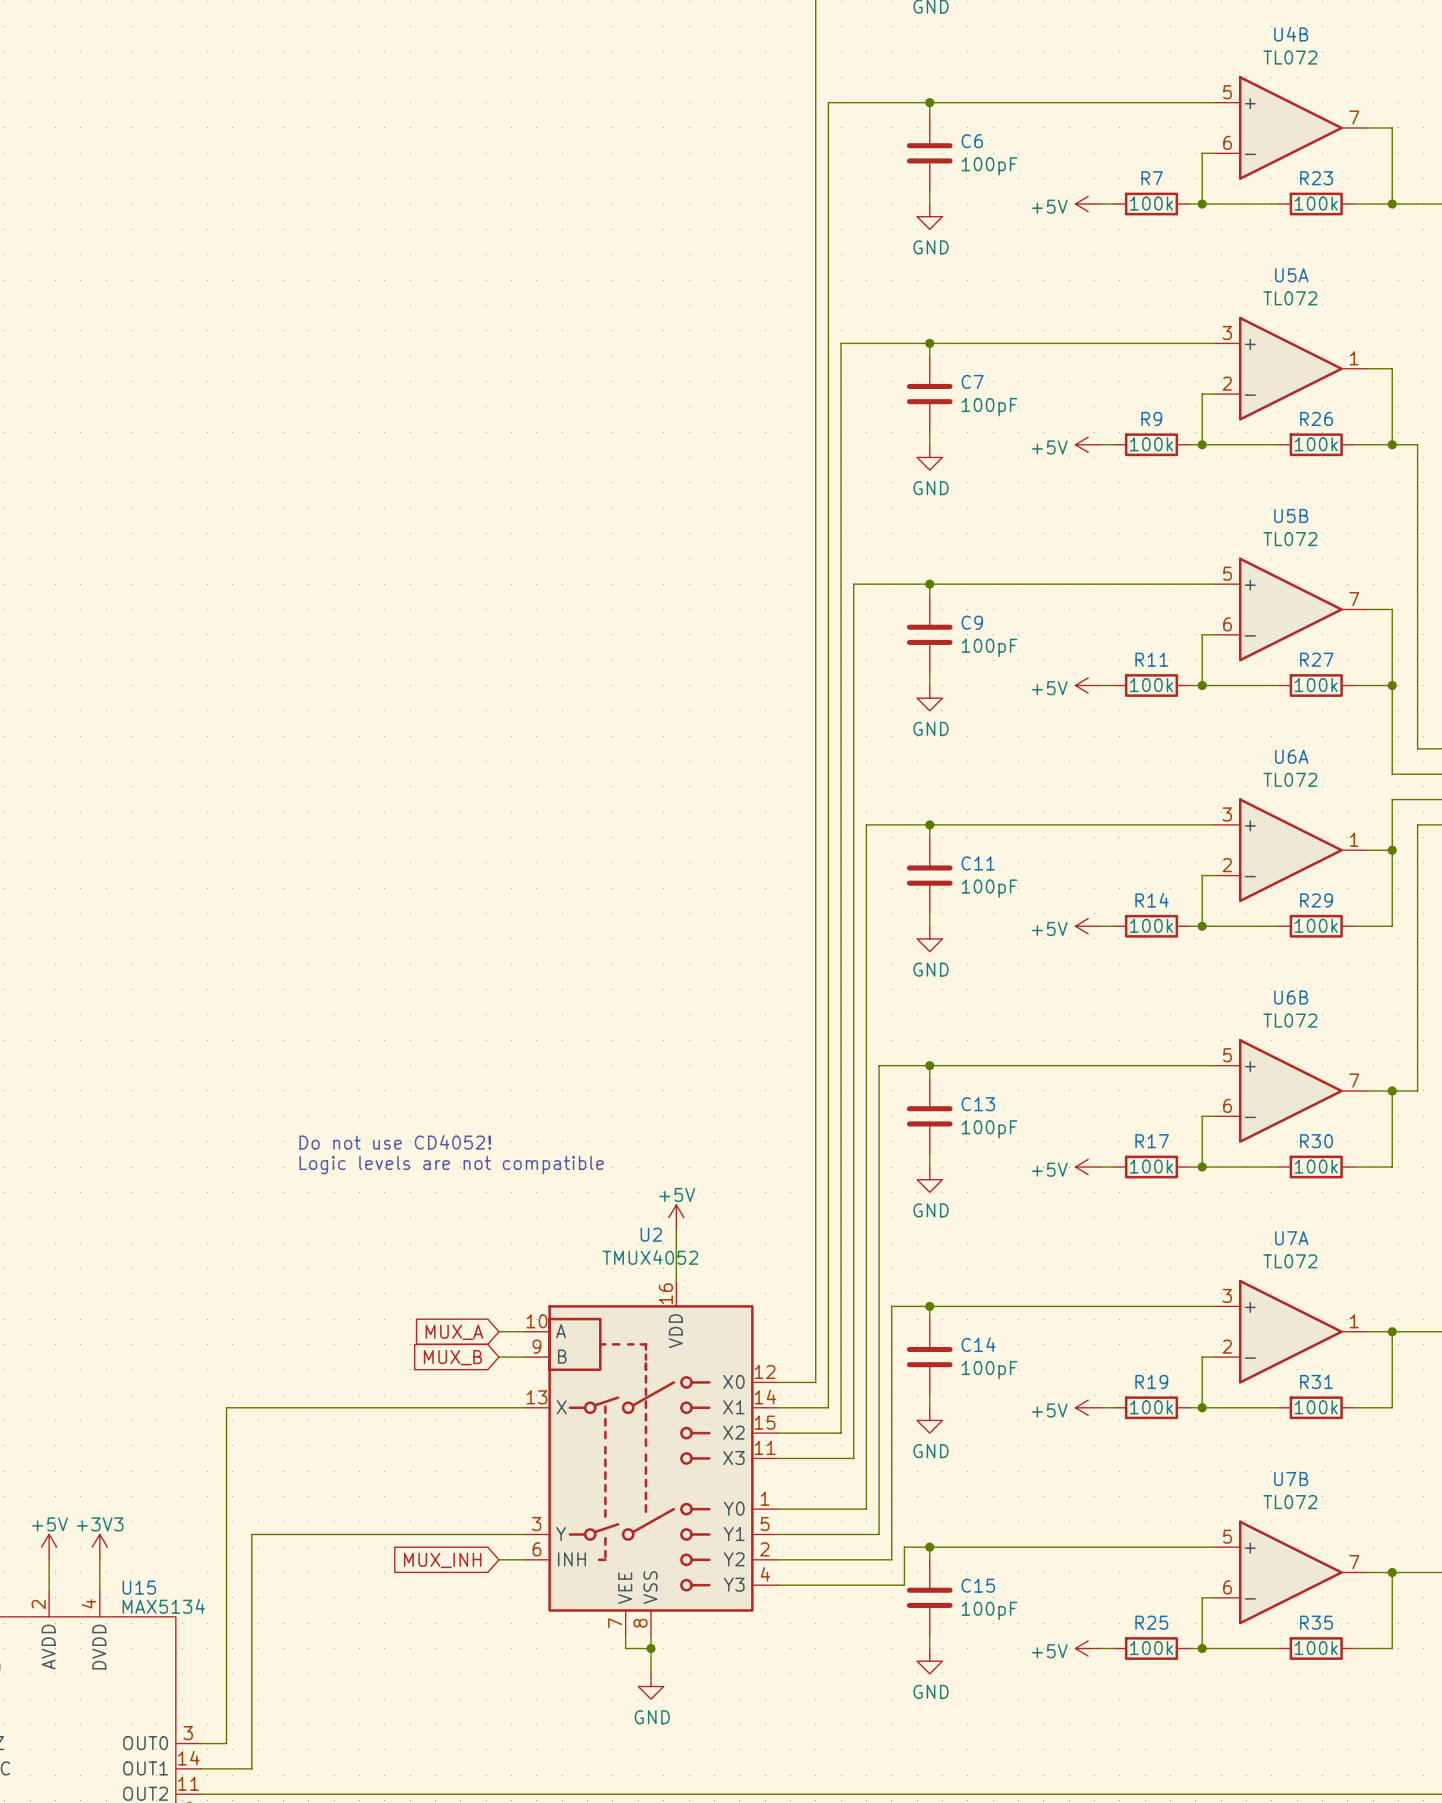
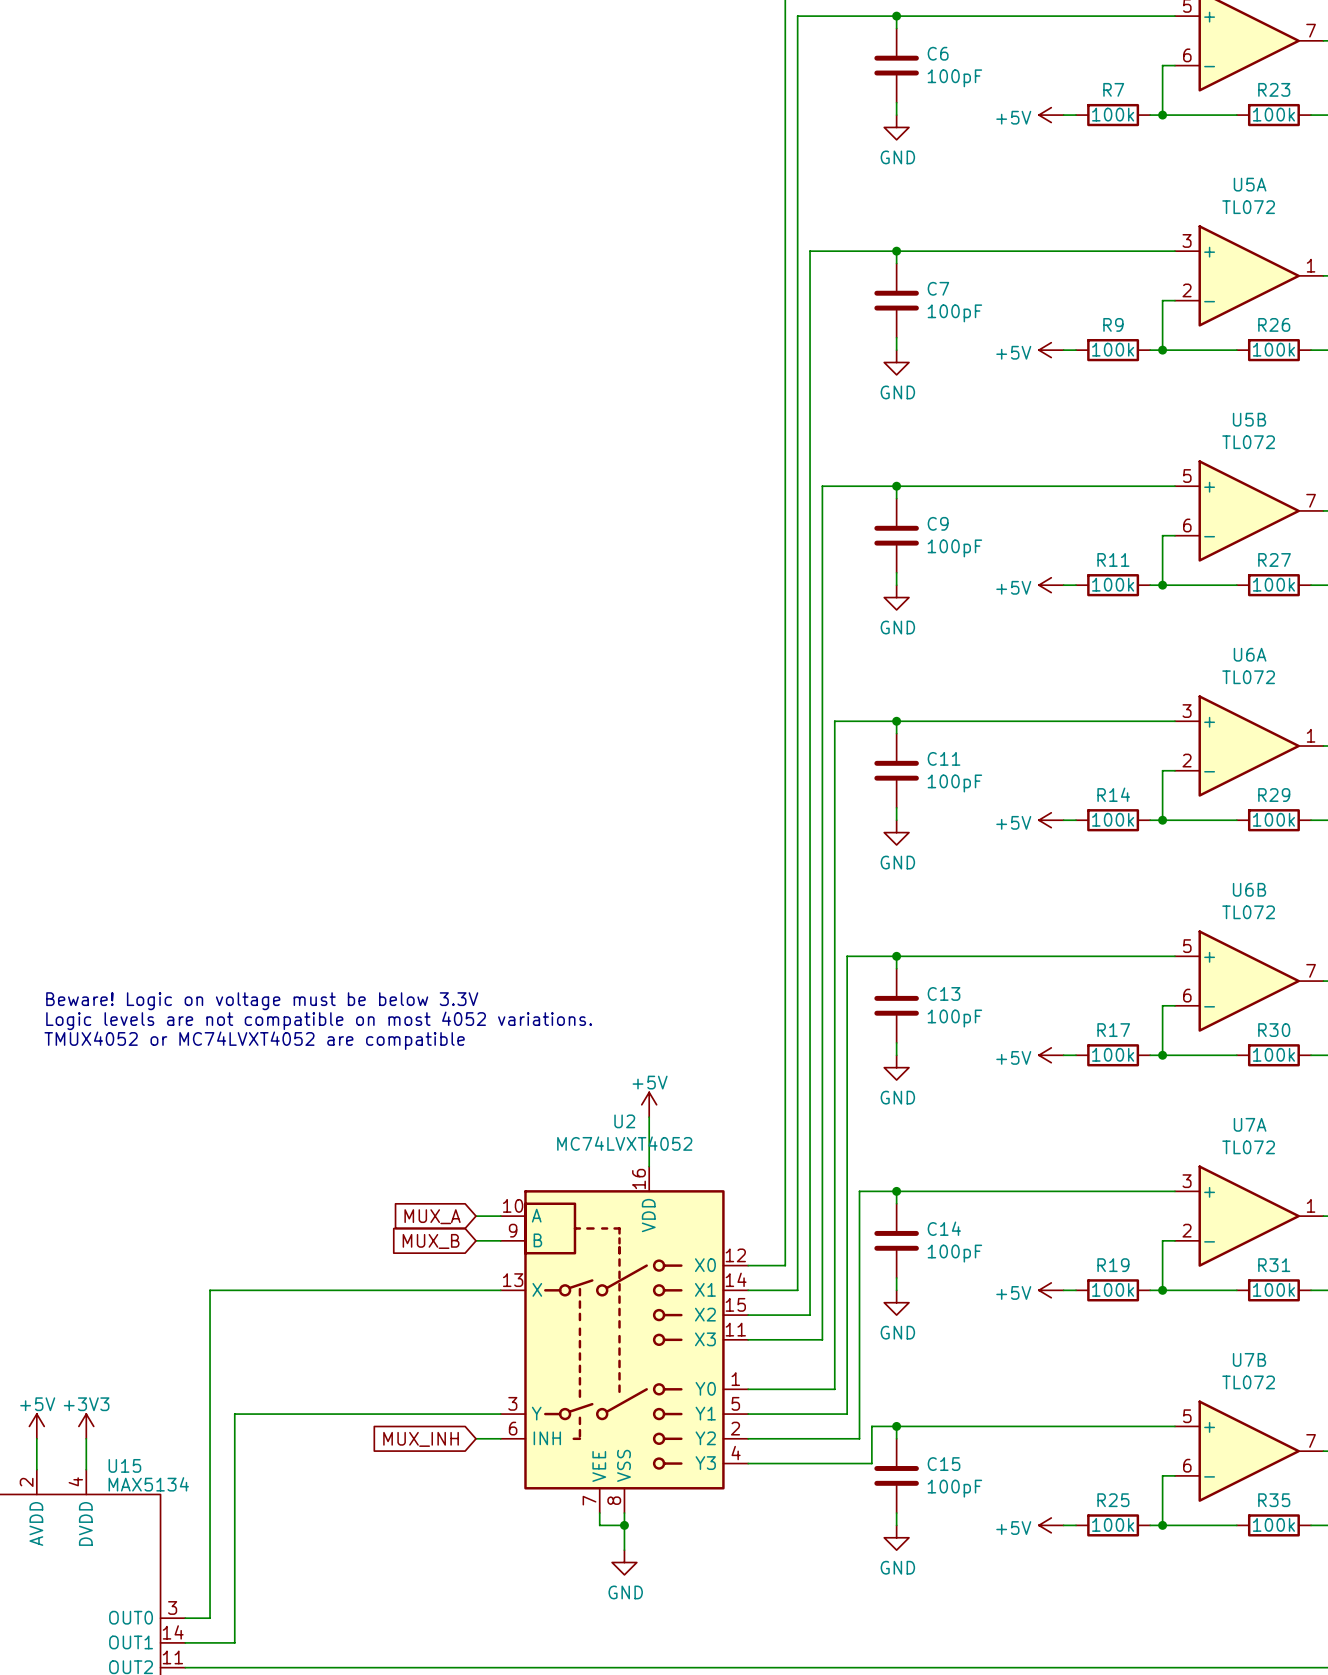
text: none -> Beware! Logic on voltage must be below 3.3V (262, 1001)
text: none -> Logic levels are not compatible on most 4052 variations. (319, 1020)
text: Do not use CD4052! (395, 1142) -> none
text: none -> TMUX4052 or MC74LVXT4052 are compatible (254, 1040)
text: Logic levels are not compatible (451, 1165) -> none
U2 value: TMUX4052 (650, 1257) -> MC74LVXT4052 (624, 1143)

